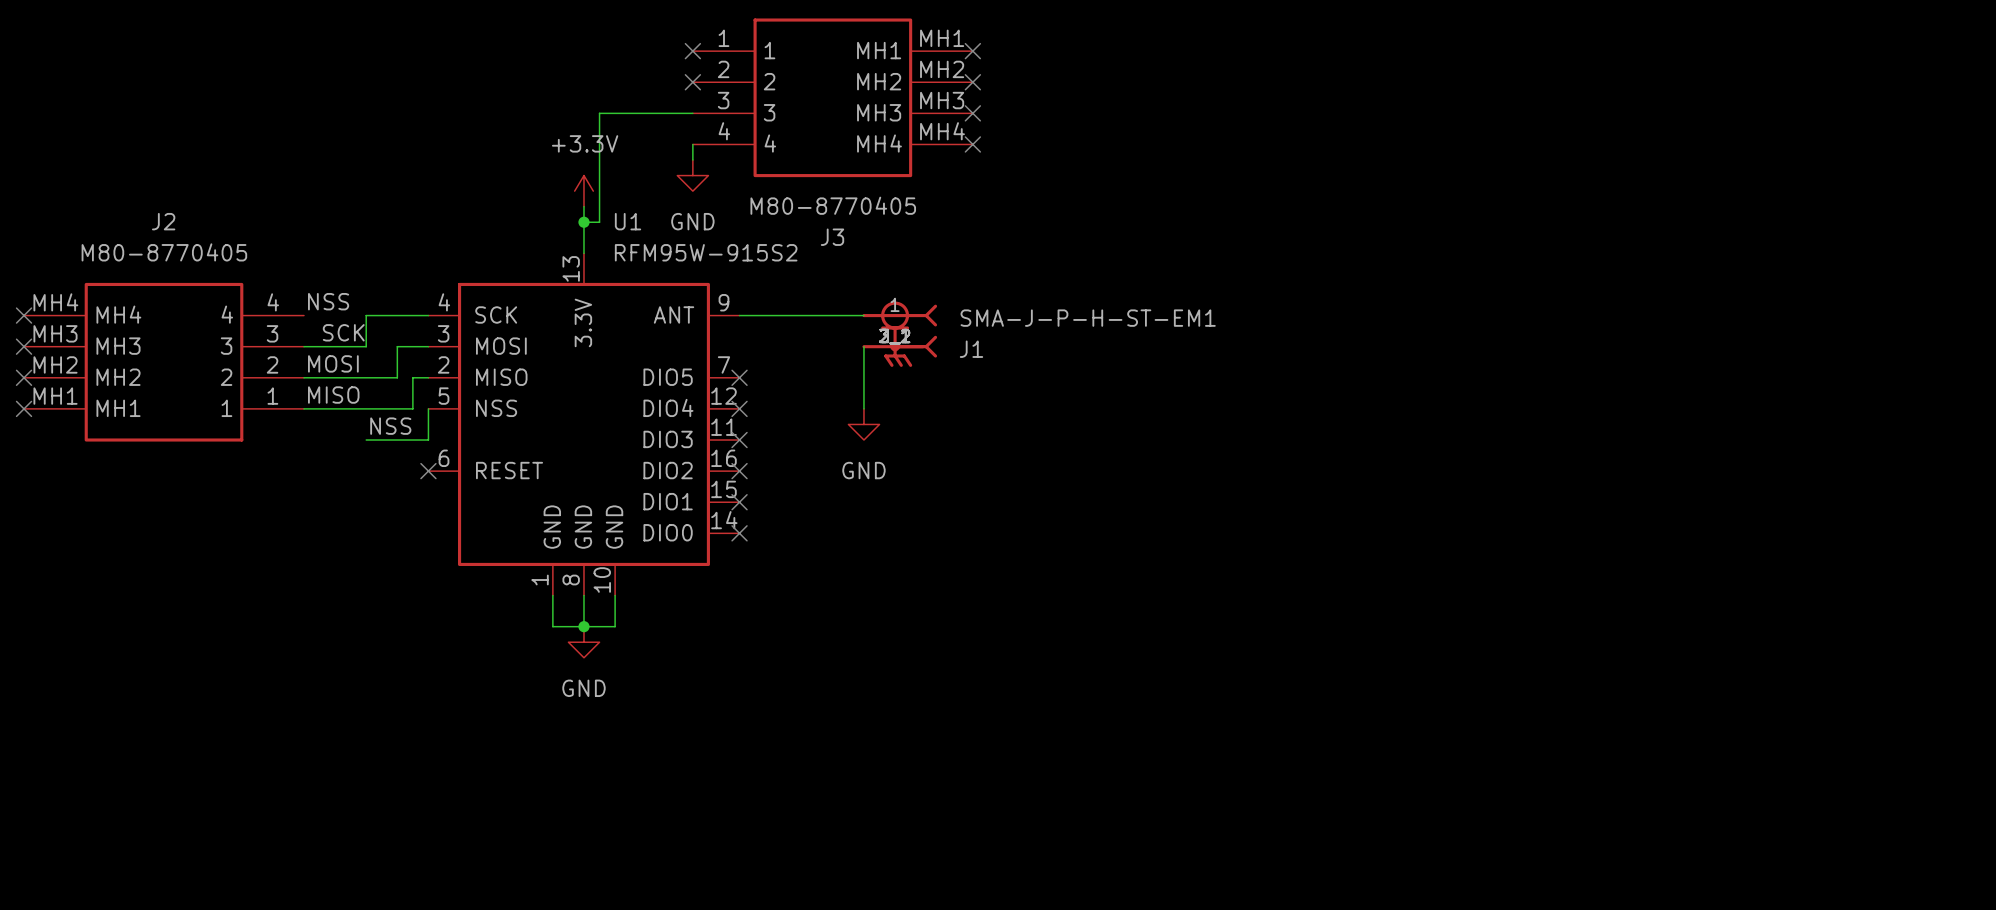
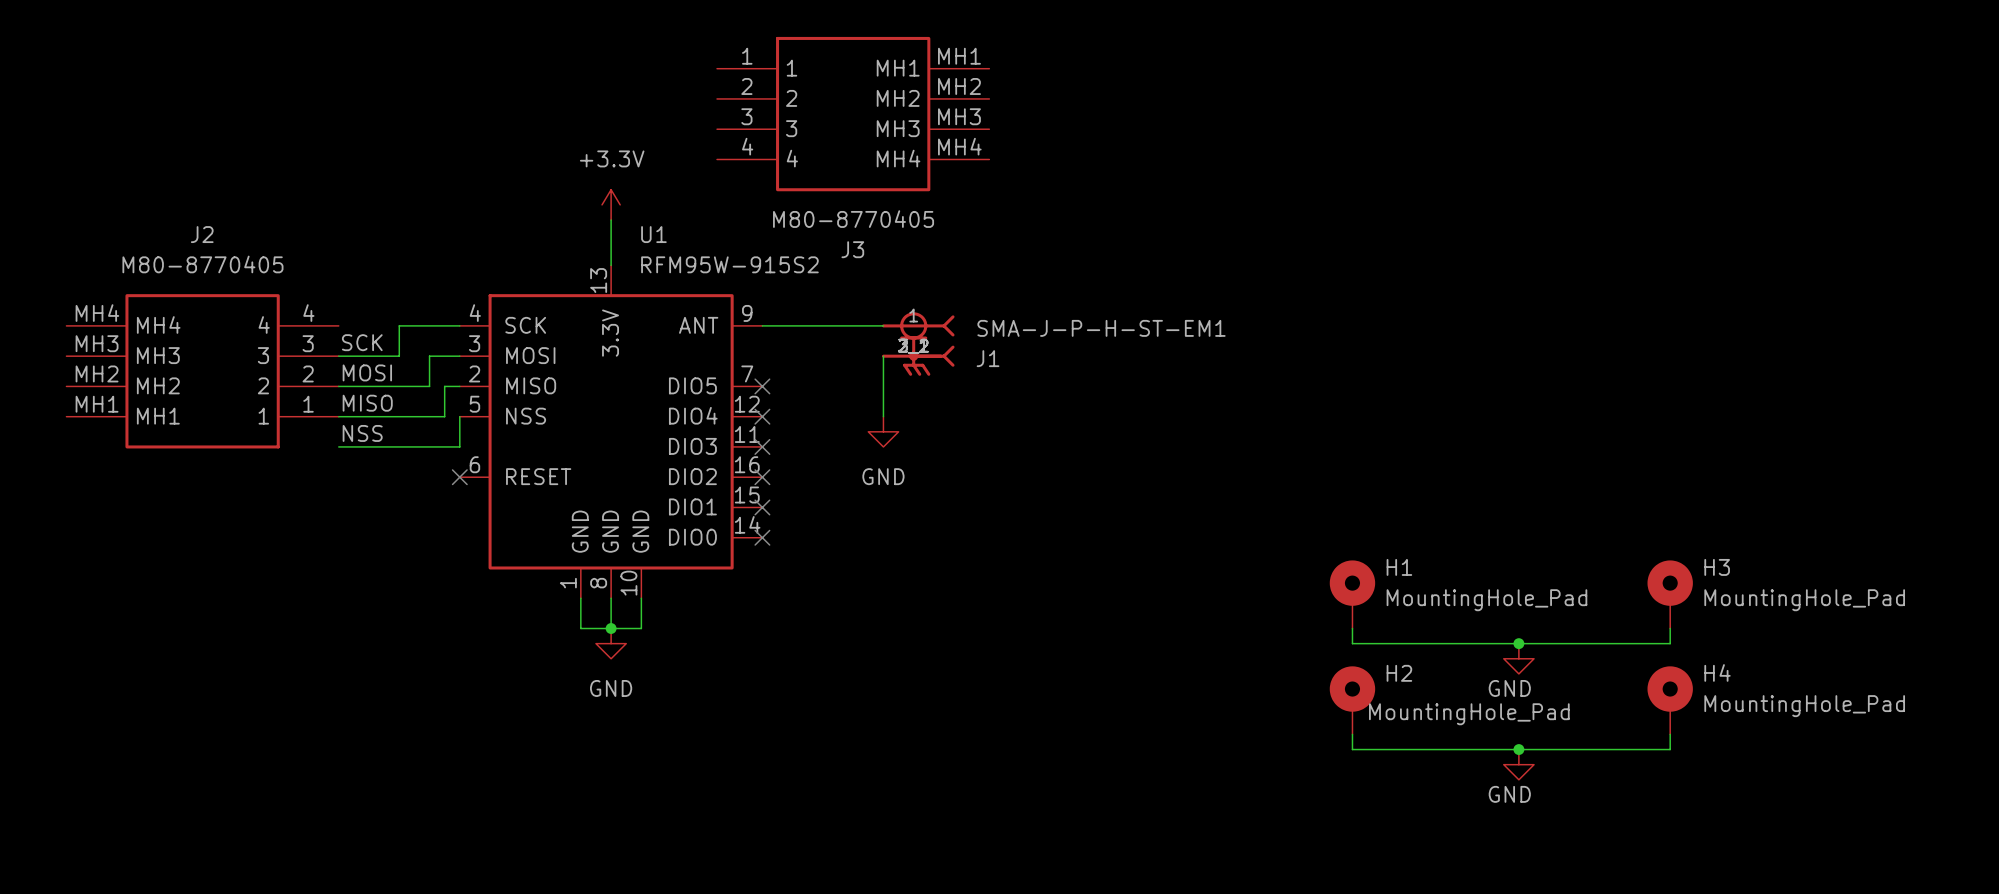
no-connect mark: (692, 51) -> none
no-connect mark: (972, 51) -> none
no-connect mark: (692, 82) -> none
no-connect mark: (972, 82) -> none
wire: (692, 113) (599, 113) (599, 222) (583, 222) -> none
no-connect mark: (972, 113) -> none
wire: (692, 144) (692, 160) -> none
no-connect mark: (972, 144) -> none
power symbol: GND (692, 175) -> none
junction: (583, 222) -> none
label: NSS (328, 301) -> none
no-connect mark: (24, 315) -> none
label position: SCK (343, 332) -> SCK (362, 342)
no-connect mark: (24, 346) -> none
no-connect mark: (24, 377) -> none
no-connect mark: (24, 408) -> none
label: none -> NSS (362, 433)
label: NSS (390, 426) -> none
wire: none -> (338, 446) (399, 446)
H1: none -> MountingHole_Pad (1352, 594)
H3: none -> MountingHole_Pad (1670, 594)
wire: none -> (1352, 628) (1352, 643) (1670, 643) (1670, 628)
junction: none -> (1518, 643)
power symbol: none -> GND (1518, 658)
H2: none -> MountingHole_Pad (1352, 700)
H4: none -> MountingHole_Pad (1670, 700)
wire: none -> (1352, 734) (1352, 749) (1670, 749) (1670, 734)
junction: none -> (1518, 749)
power symbol: none -> GND (1518, 764)

